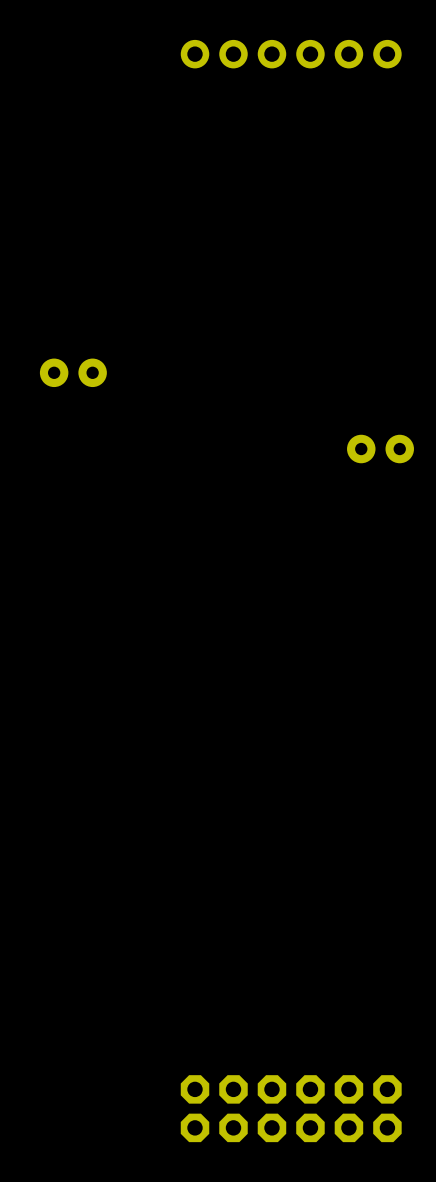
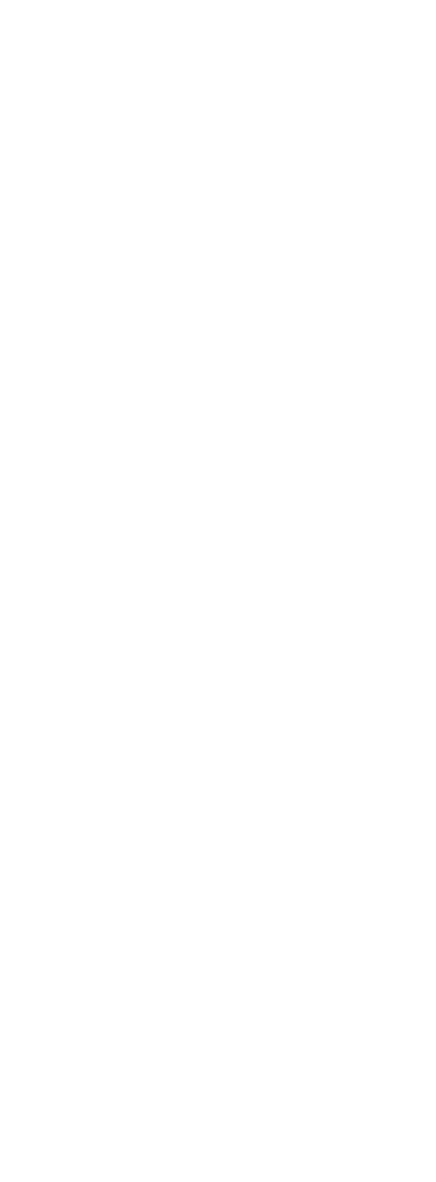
part: (291, 54) -> none
part: (73, 372) -> none
part: (380, 449) -> none
part: (291, 1108) -> none

